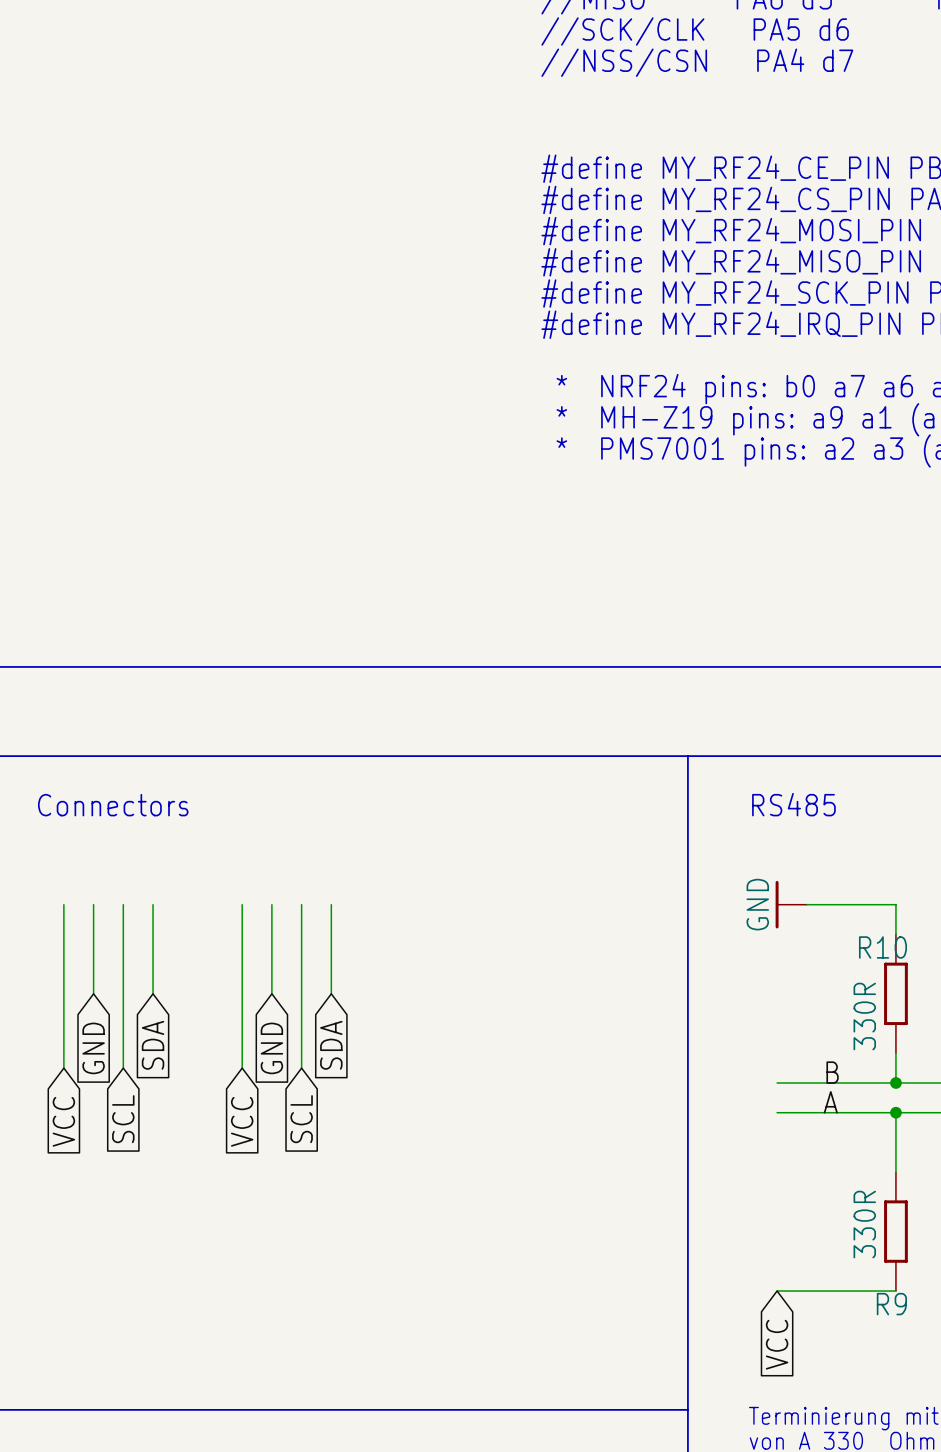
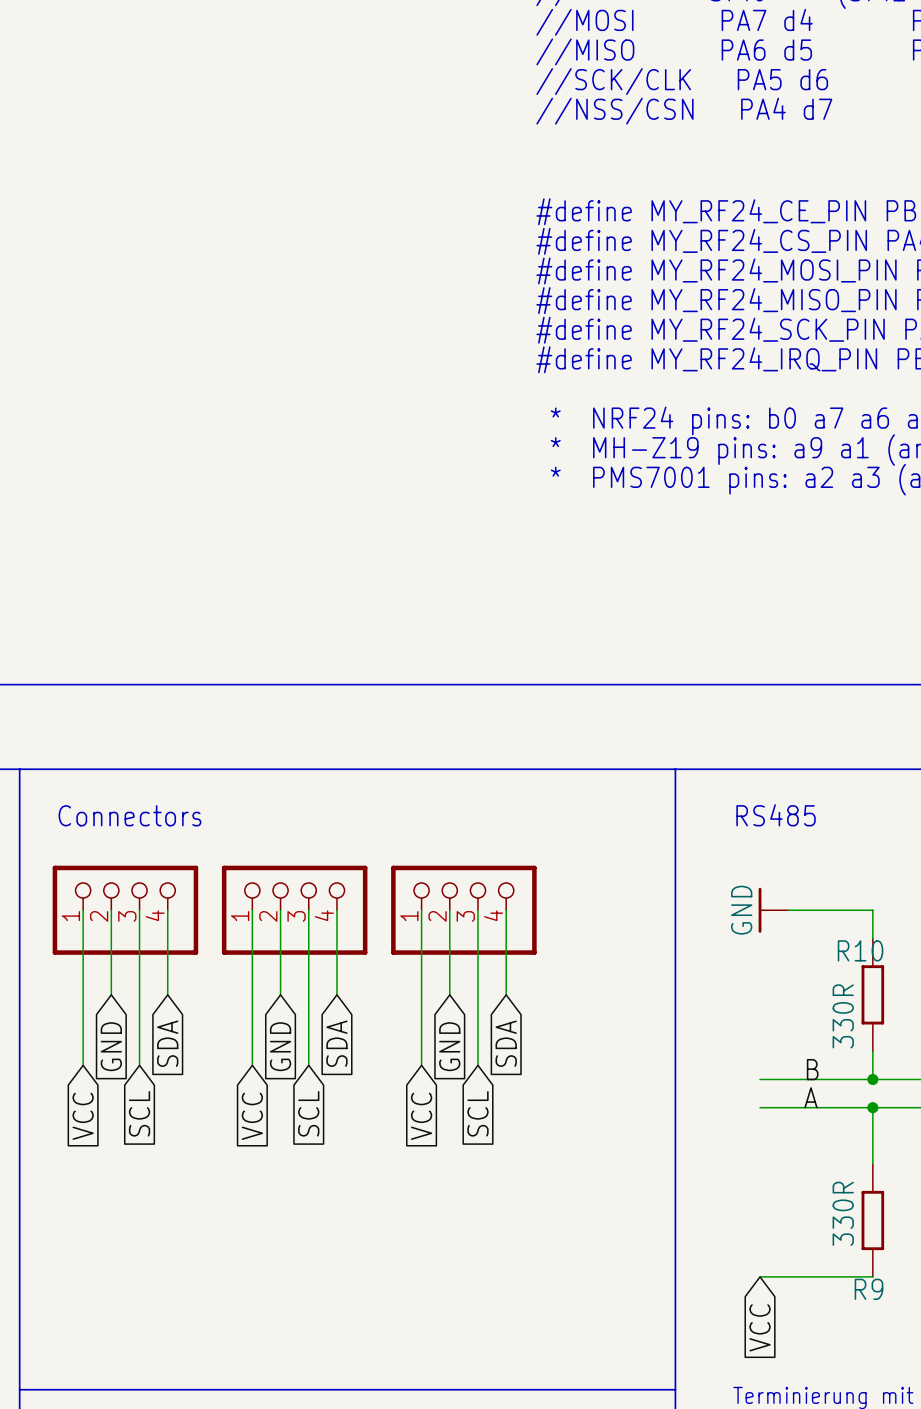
part: none -> (125, 910)
part: none -> (294, 910)
wire: none -> (421, 910) (421, 1065)
wire: none -> (449, 910) (449, 994)
part: none -> (463, 910)
wire: none -> (477, 910) (477, 1065)
wire: none -> (506, 910) (506, 994)
global label: none -> SDA (506, 1043)
global label: none -> GND (449, 1046)
global label: none -> SCL (477, 1113)
global label: none -> VCC (421, 1116)

